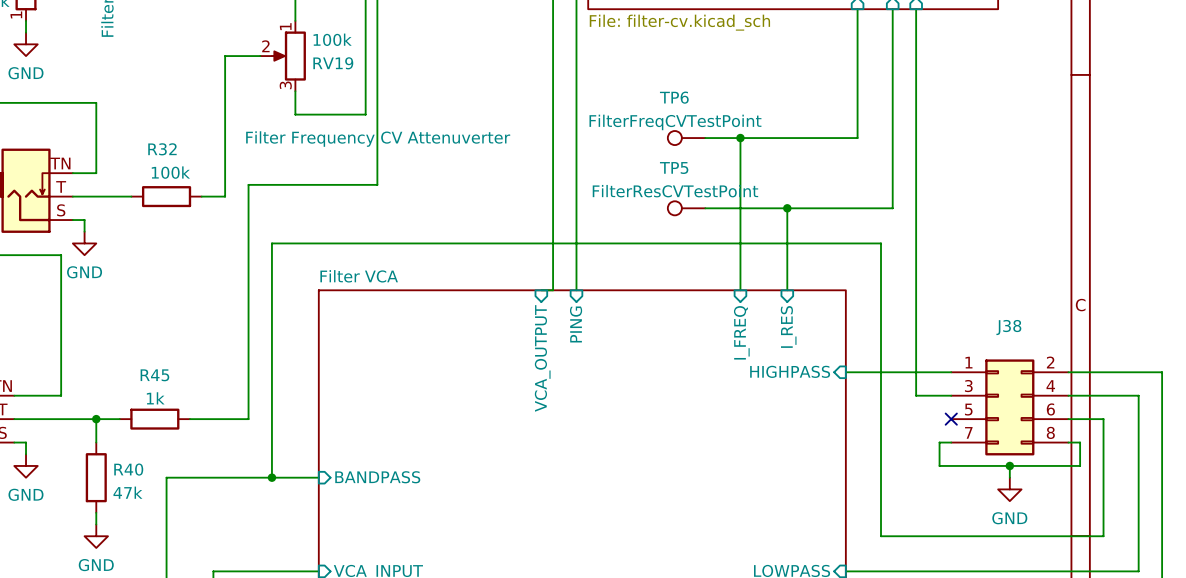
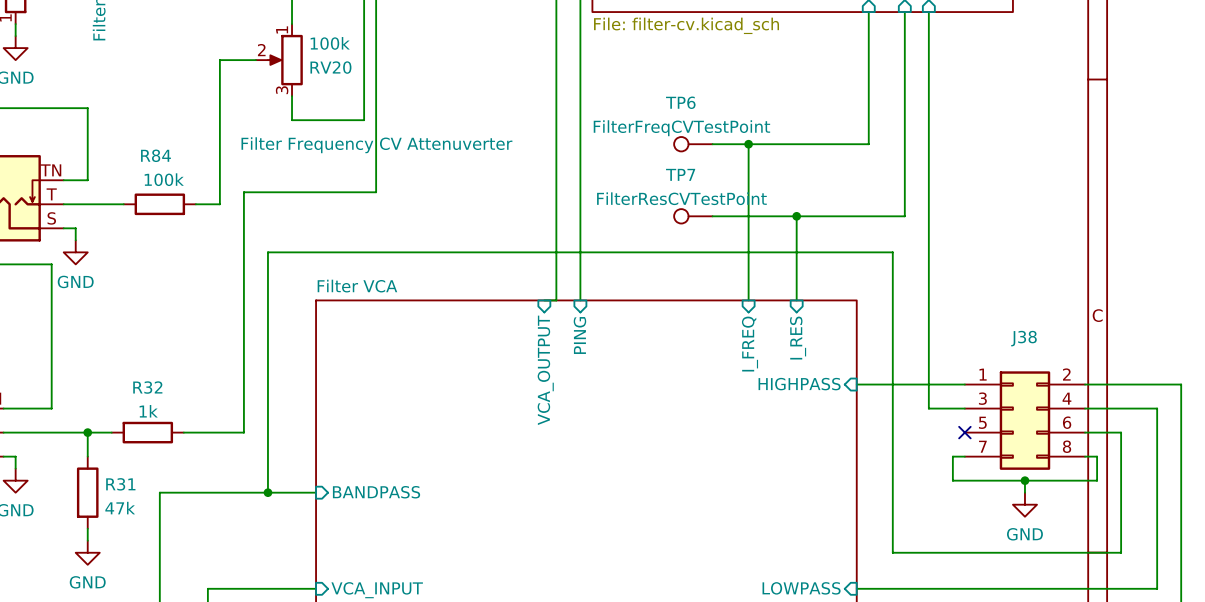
RV19 name: RV19 (333, 63) -> RV20 (330, 67)
R32 name: R32 (162, 149) -> R84 (155, 155)
TP5 name: TP5 (674, 168) -> TP7 (680, 174)
R45 name: R45 (154, 375) -> R32 (147, 387)
R40 name: R40 (128, 469) -> R31 (120, 484)

